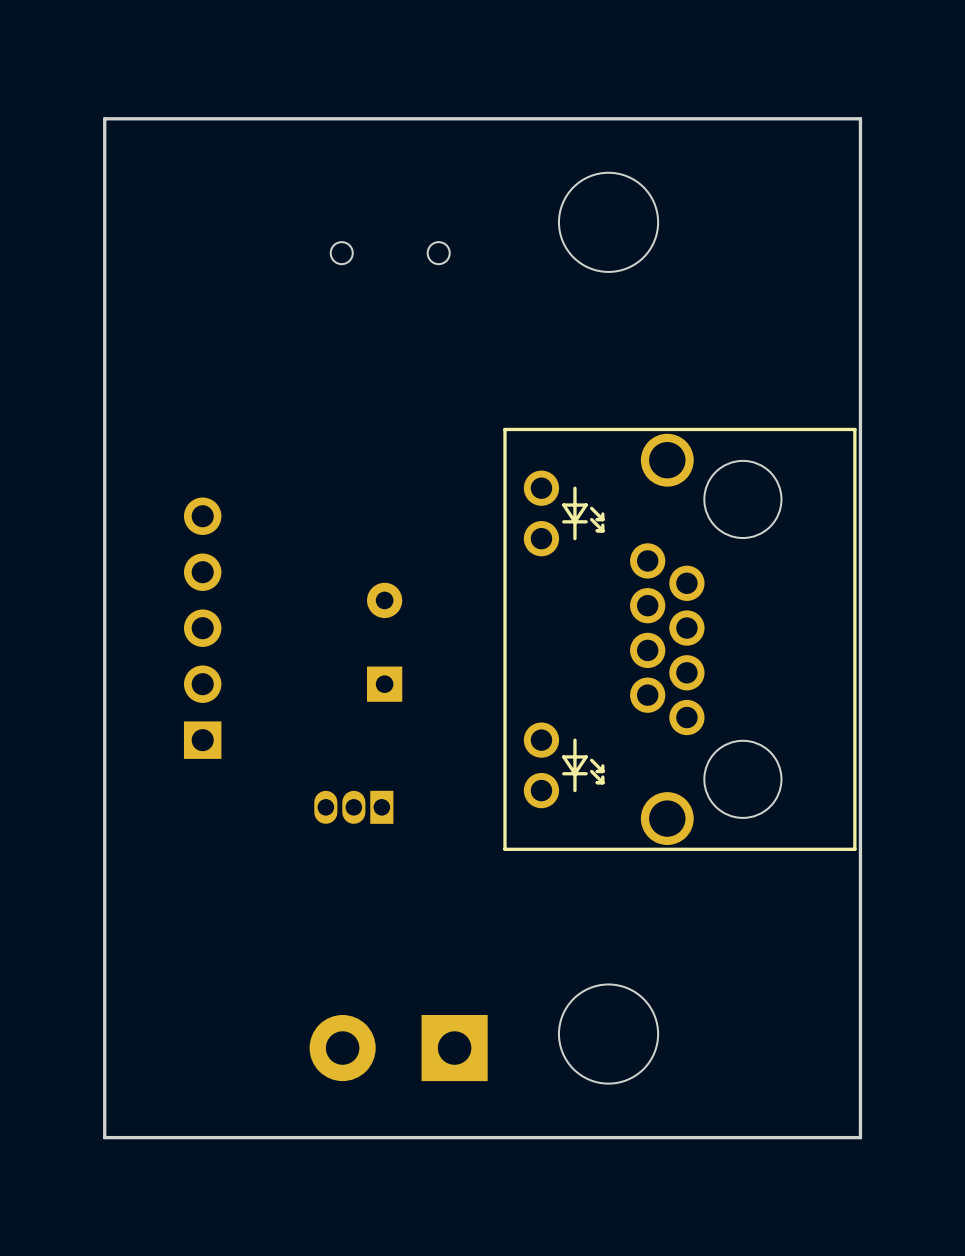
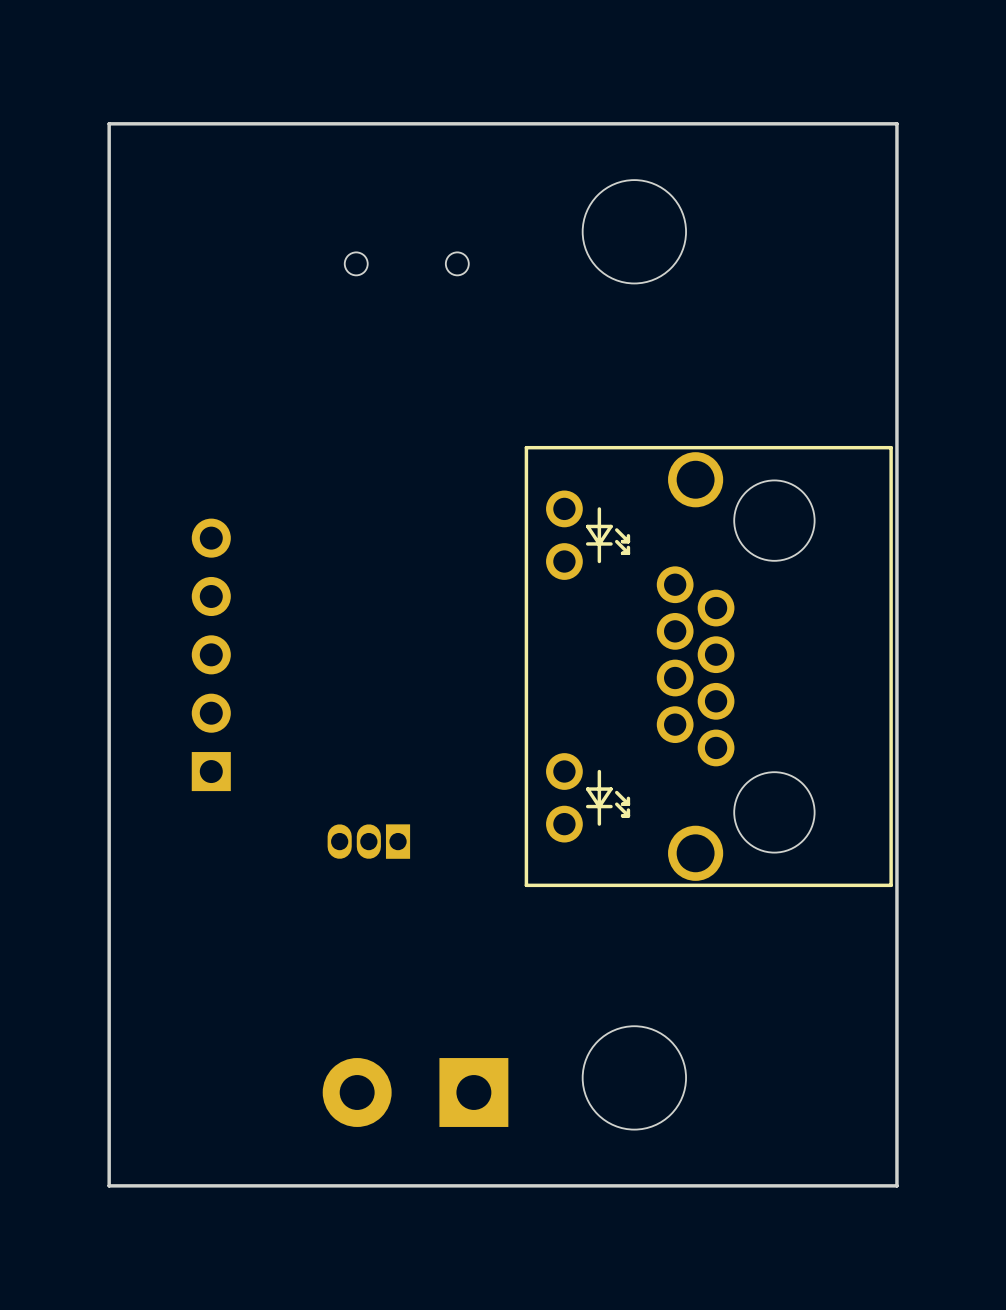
part: (384, 642) -> none

